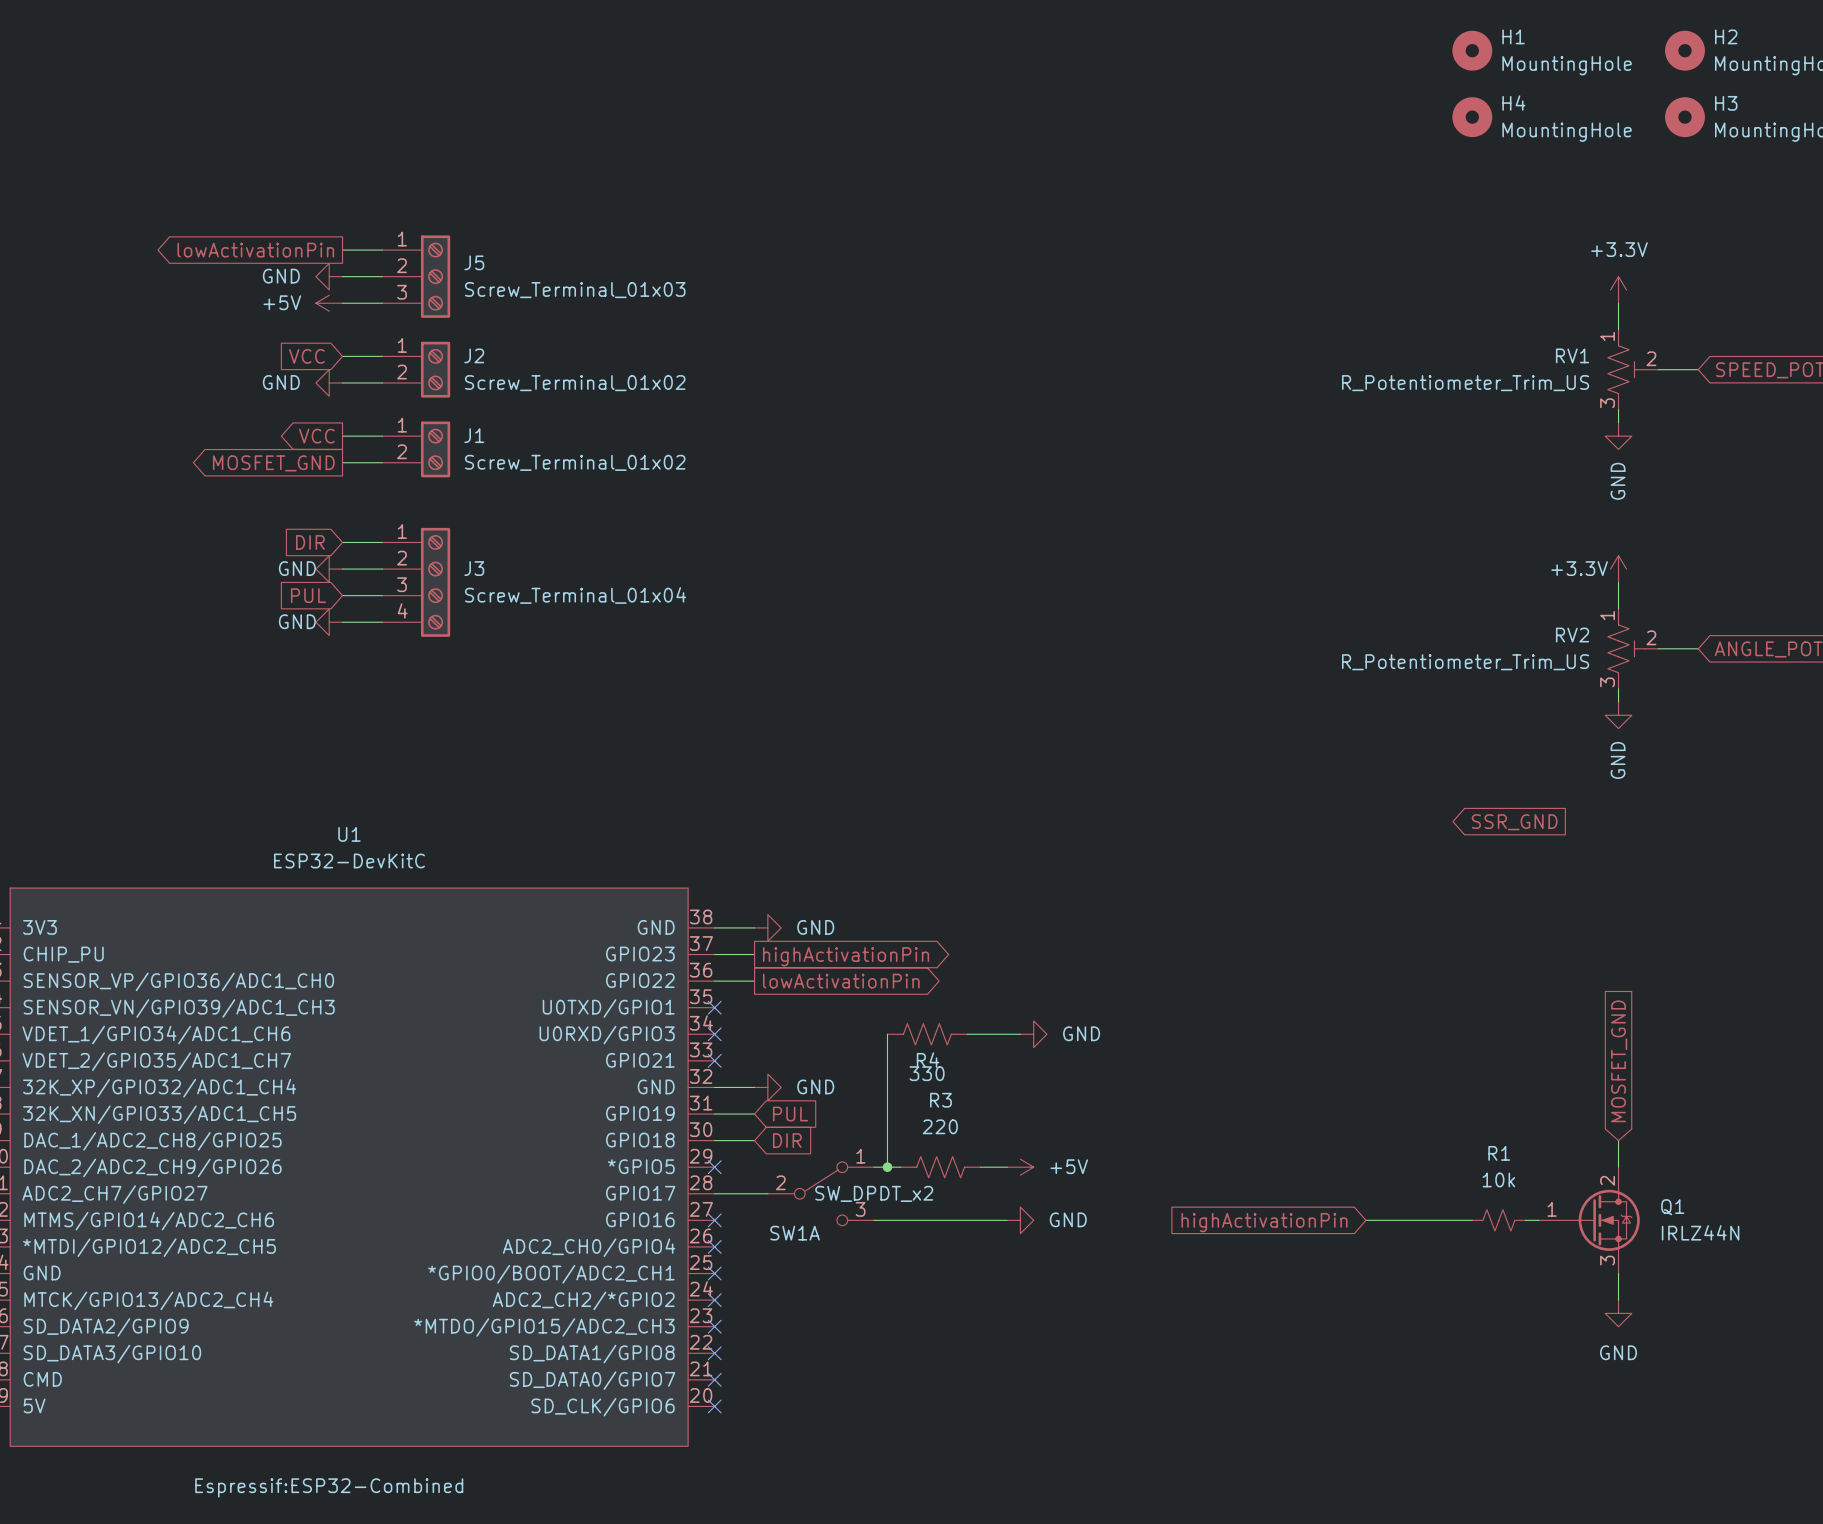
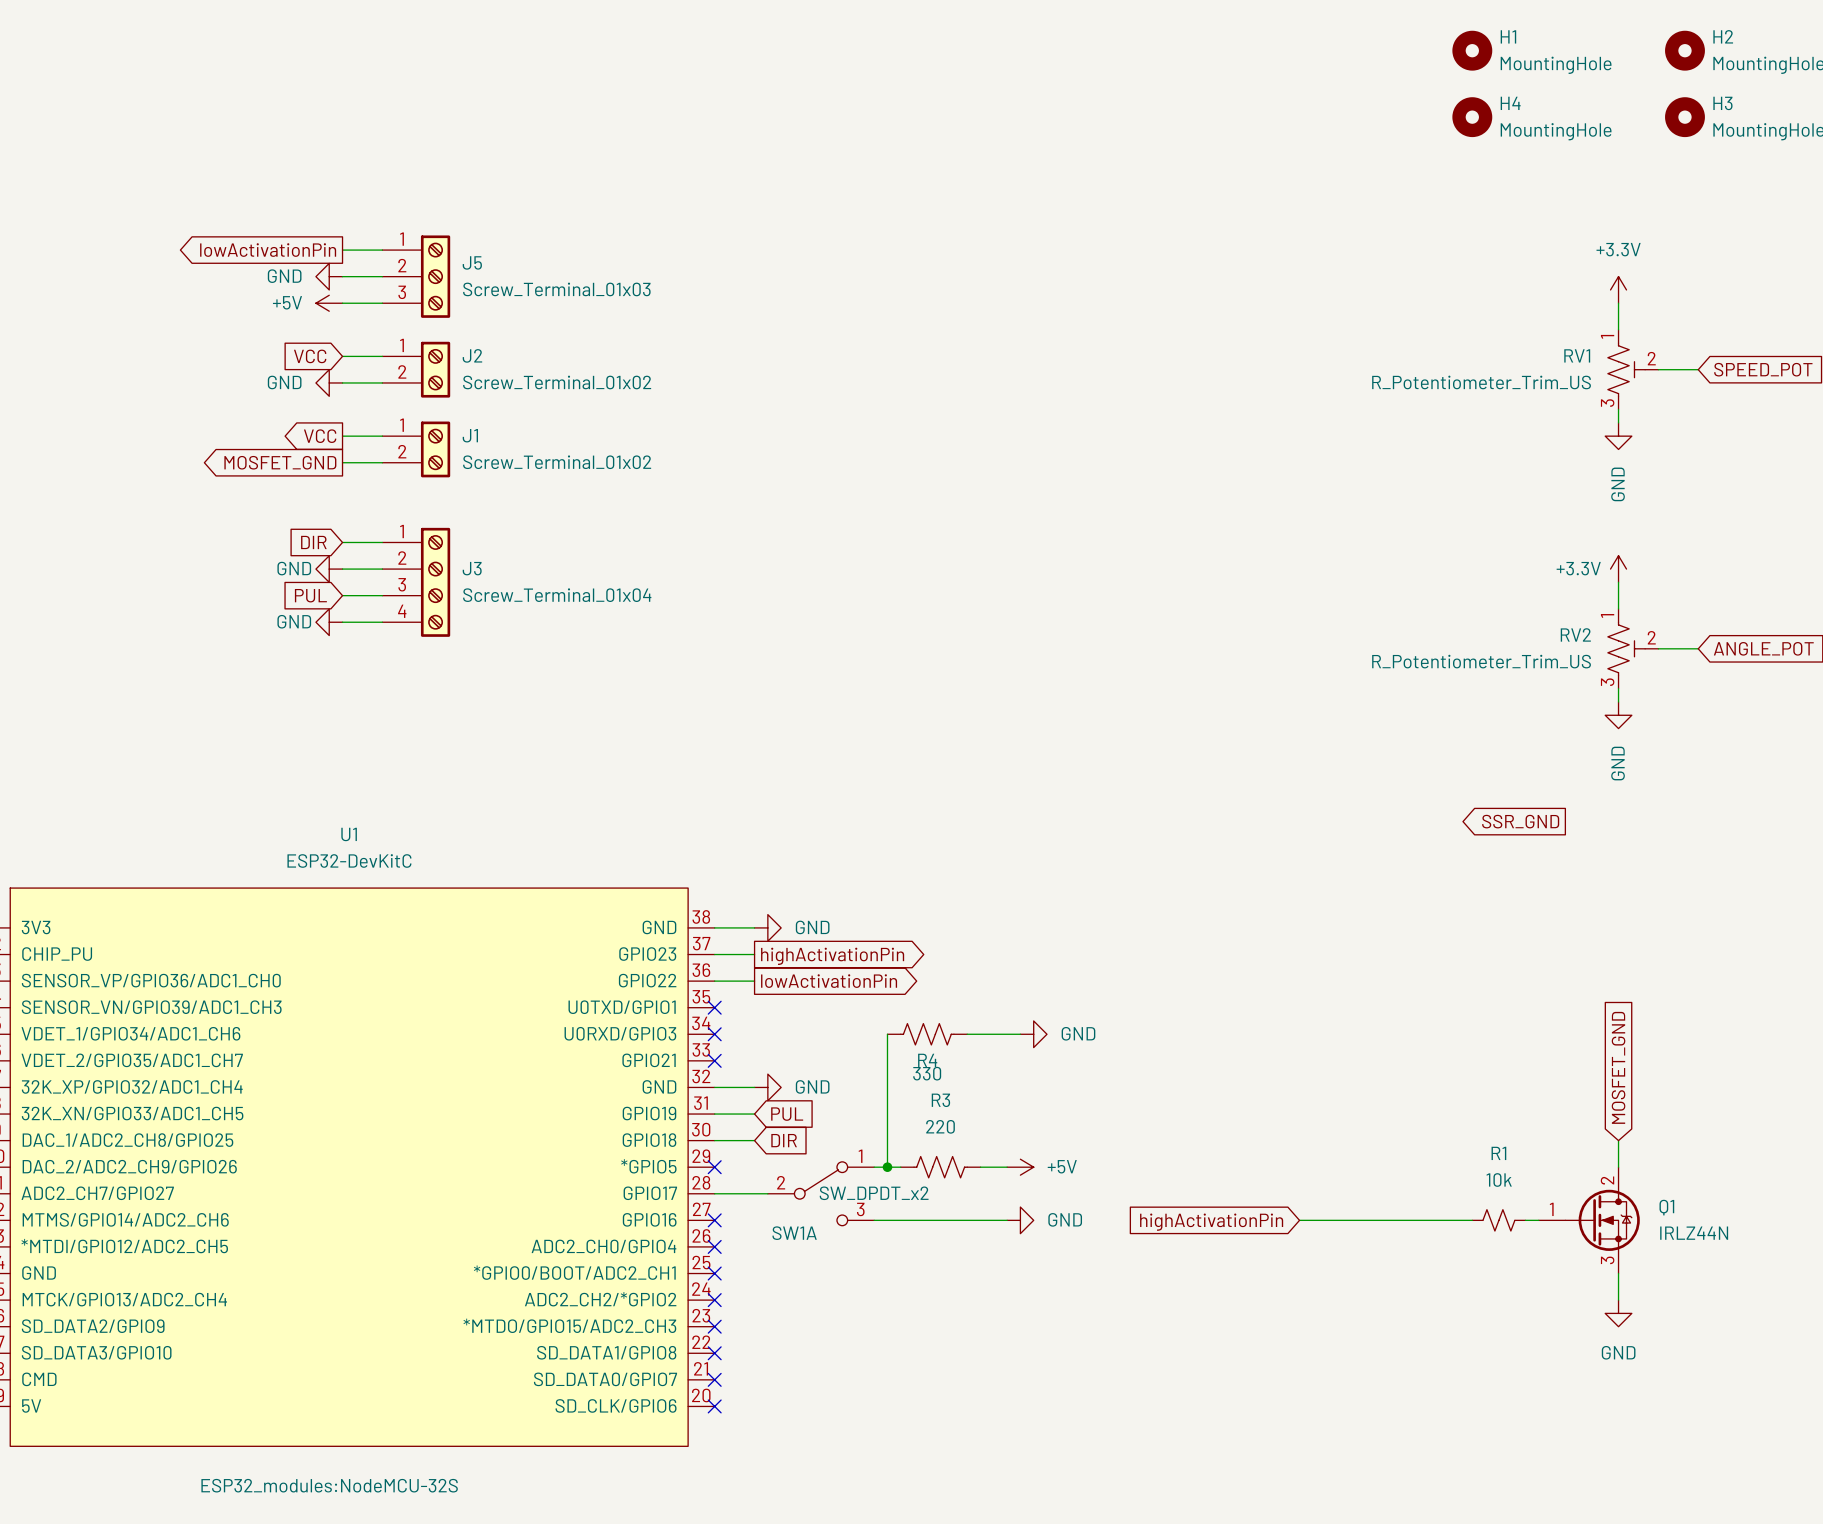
wire: none -> (1299, 1220) (1365, 1220)
global label position: highActivationPin (1264, 1222) -> highActivationPin (1211, 1222)
U1 text: Espressif:ESP32-Combined (329, 1487) -> ESP32_modules:NodeMCU-32S (329, 1485)

